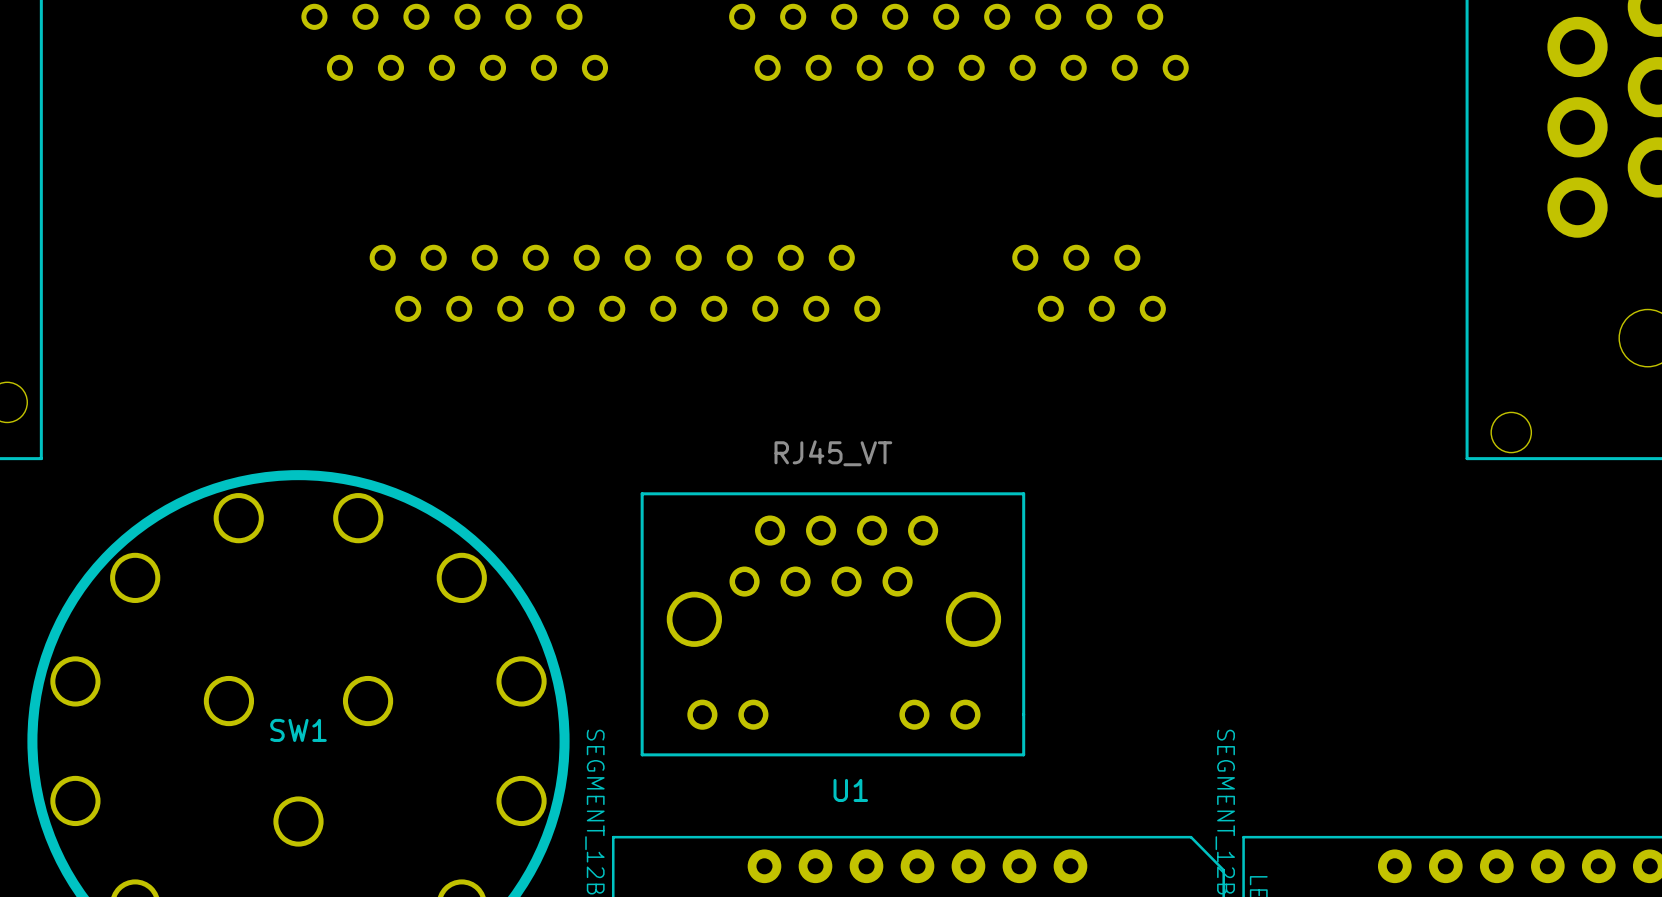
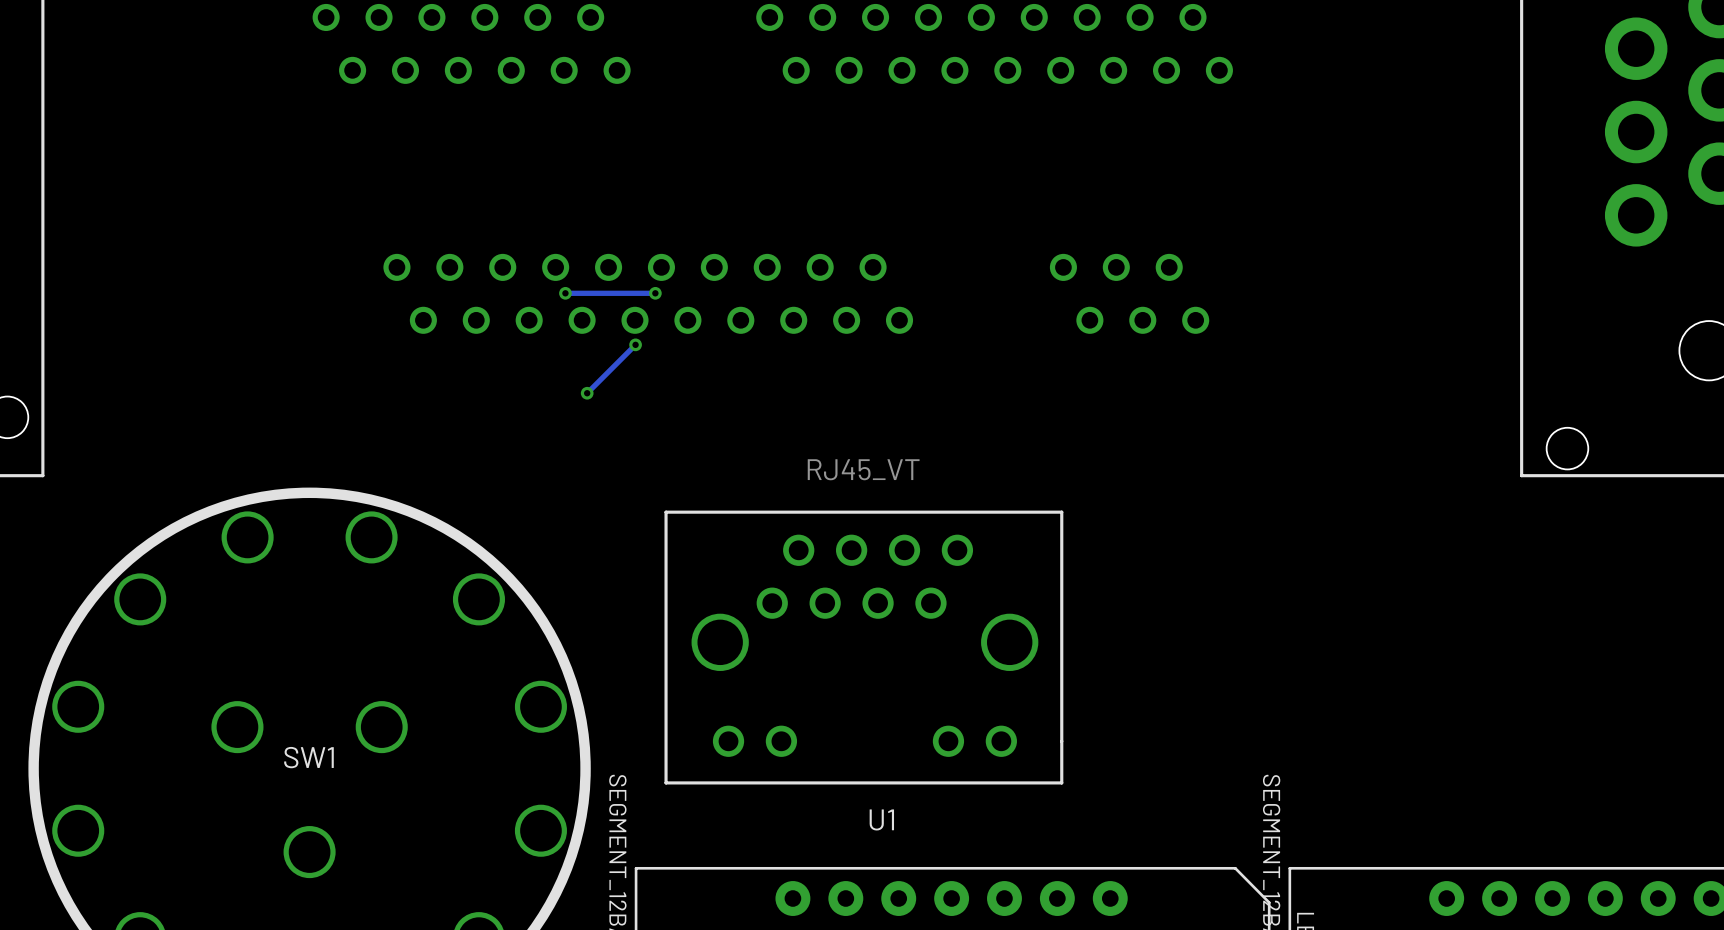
via: none -> (565, 293)
track: none -> (655, 293) (565, 293)
via: none -> (655, 293)
track: none -> (635, 344) (587, 393)
via: none -> (635, 344)
via: none -> (587, 393)

